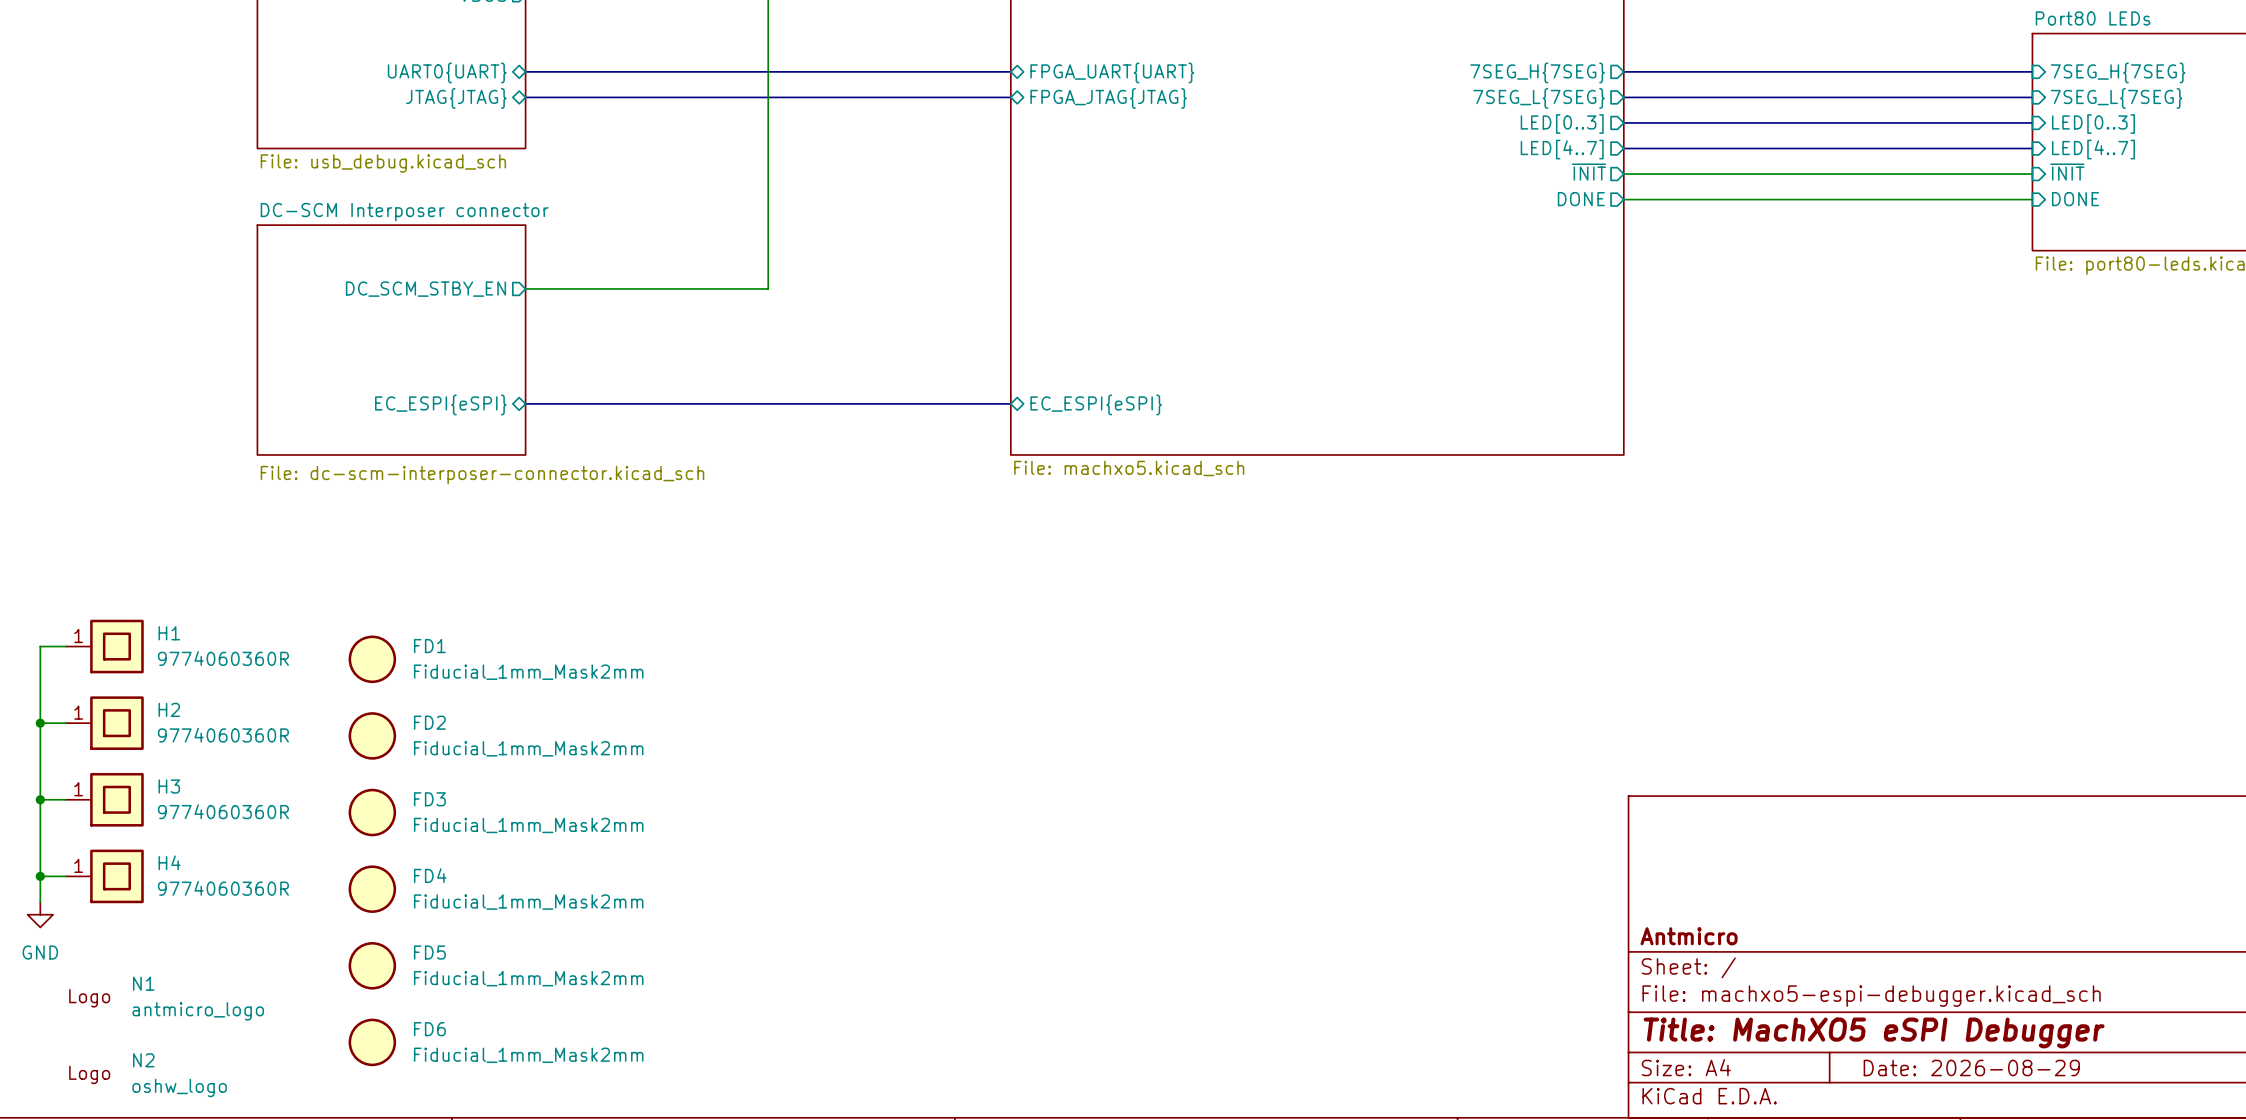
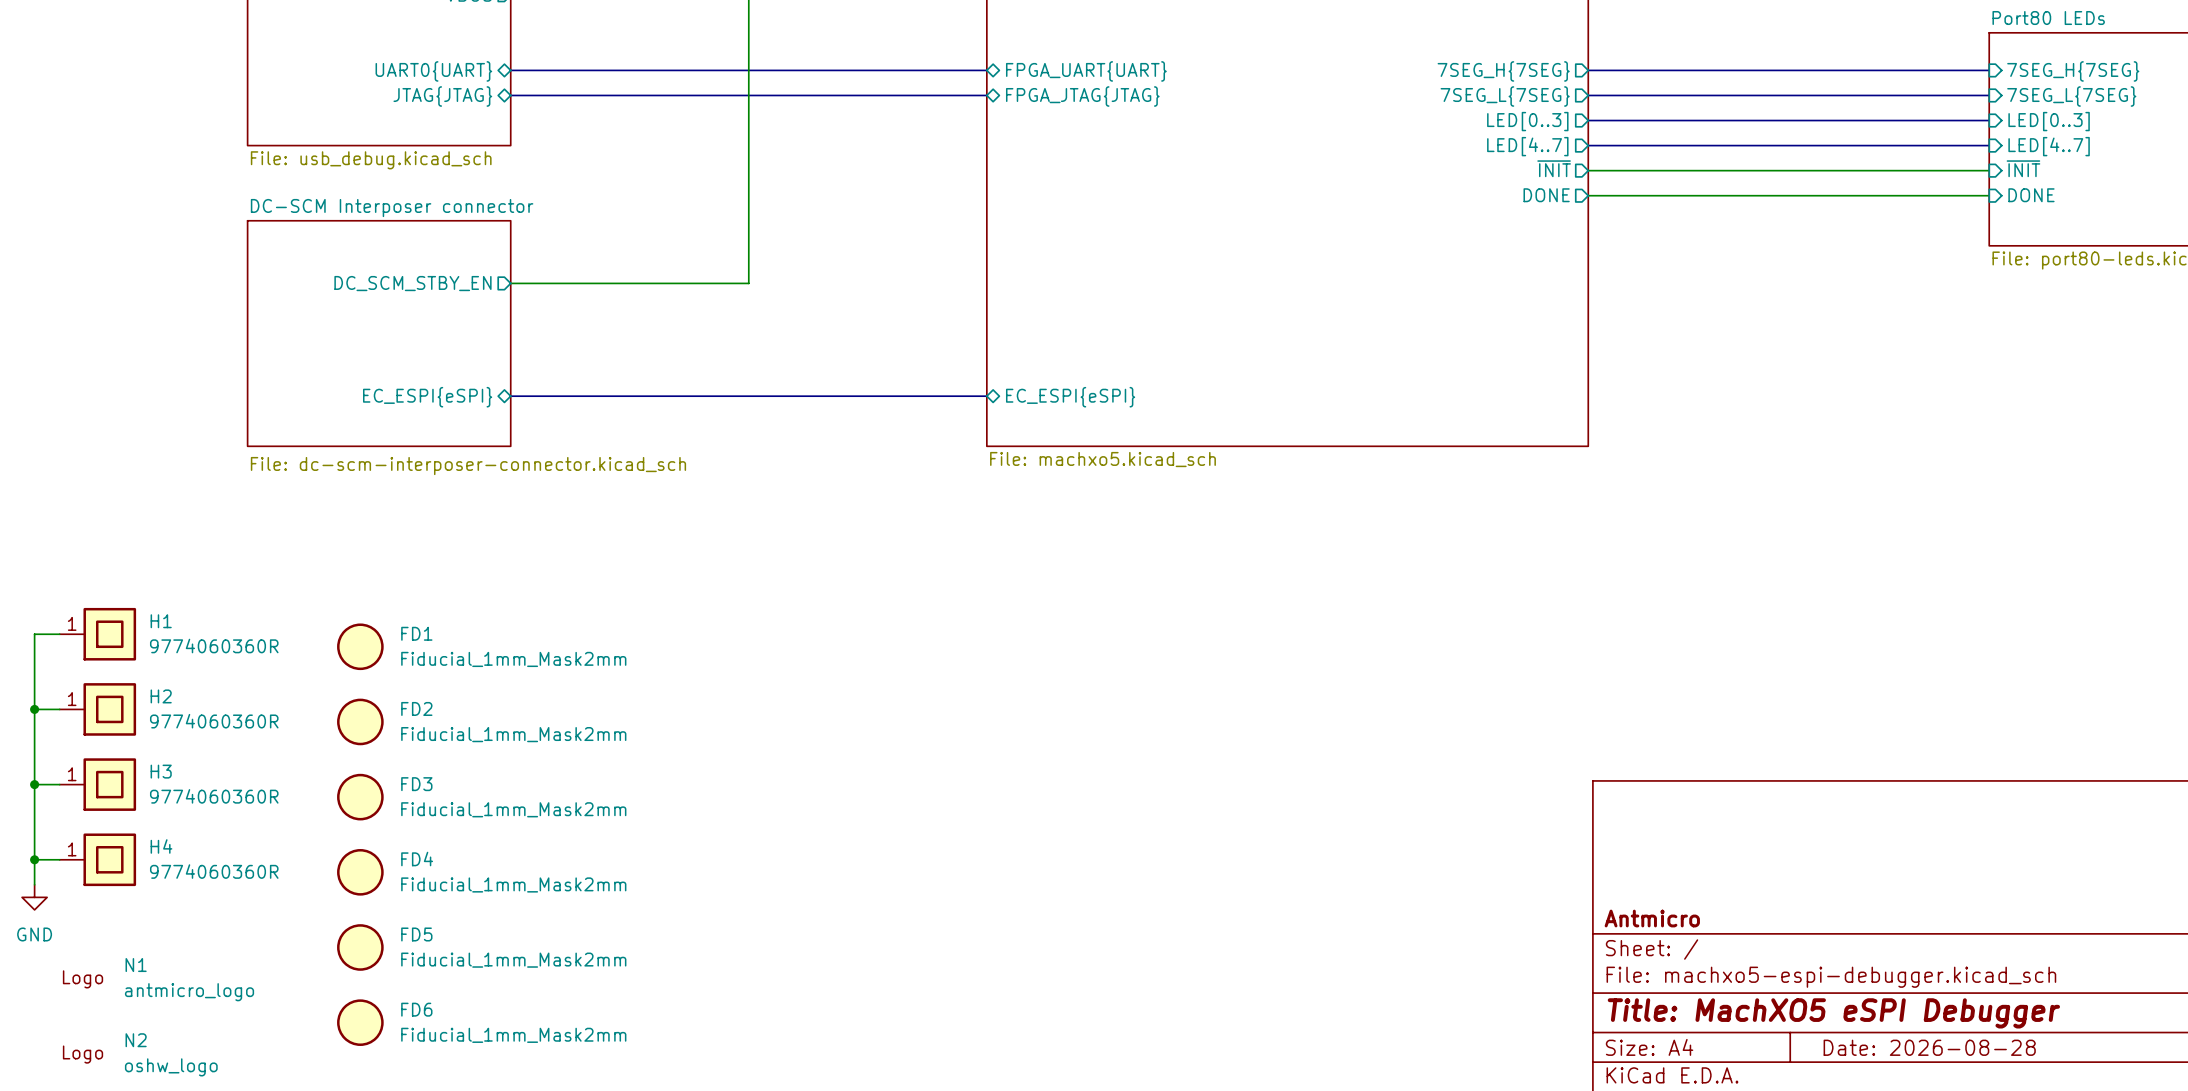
title block: Date: 2026-08-29 (1971, 1067) -> Date: 2026-08-28 (1929, 1047)

